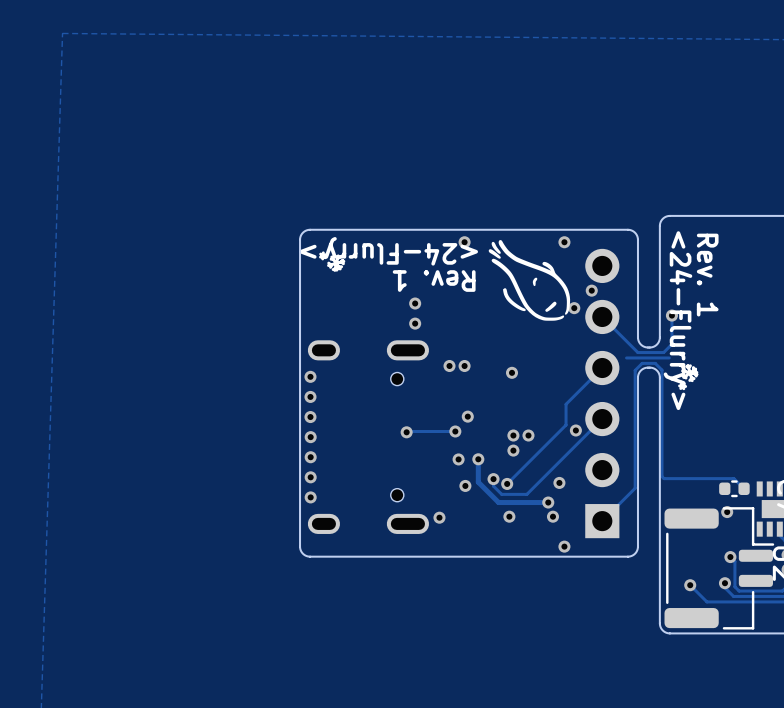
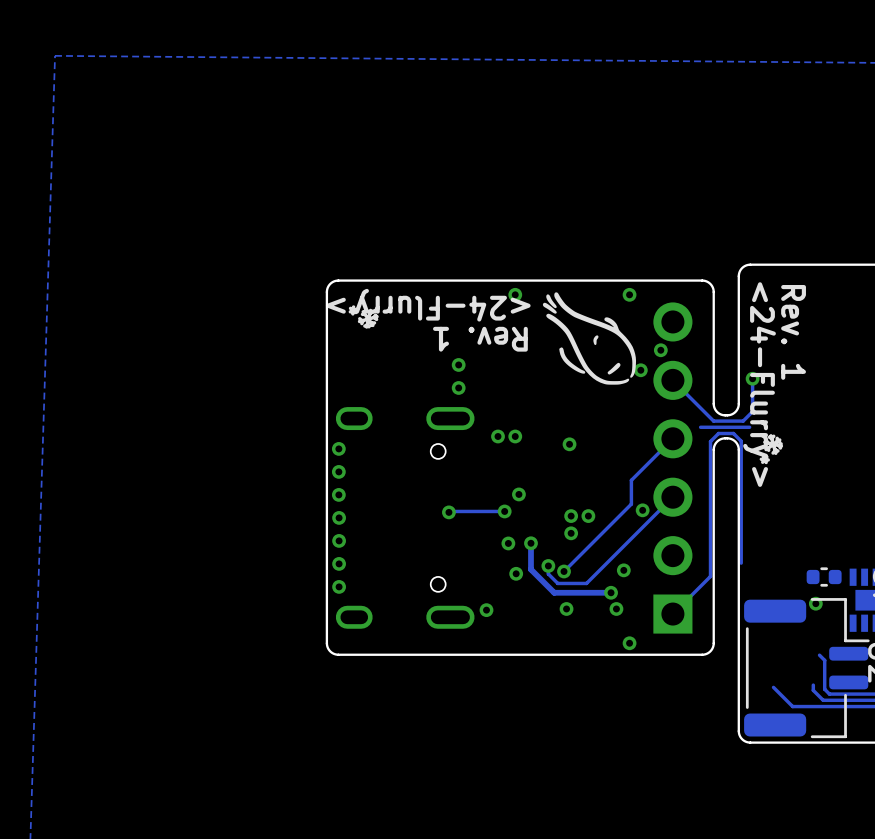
track: (661, 476) (663, 478) (733, 478) (744, 488) -> none
via: (730, 557) -> none
via: (724, 583) -> none
via: (690, 585) -> none

